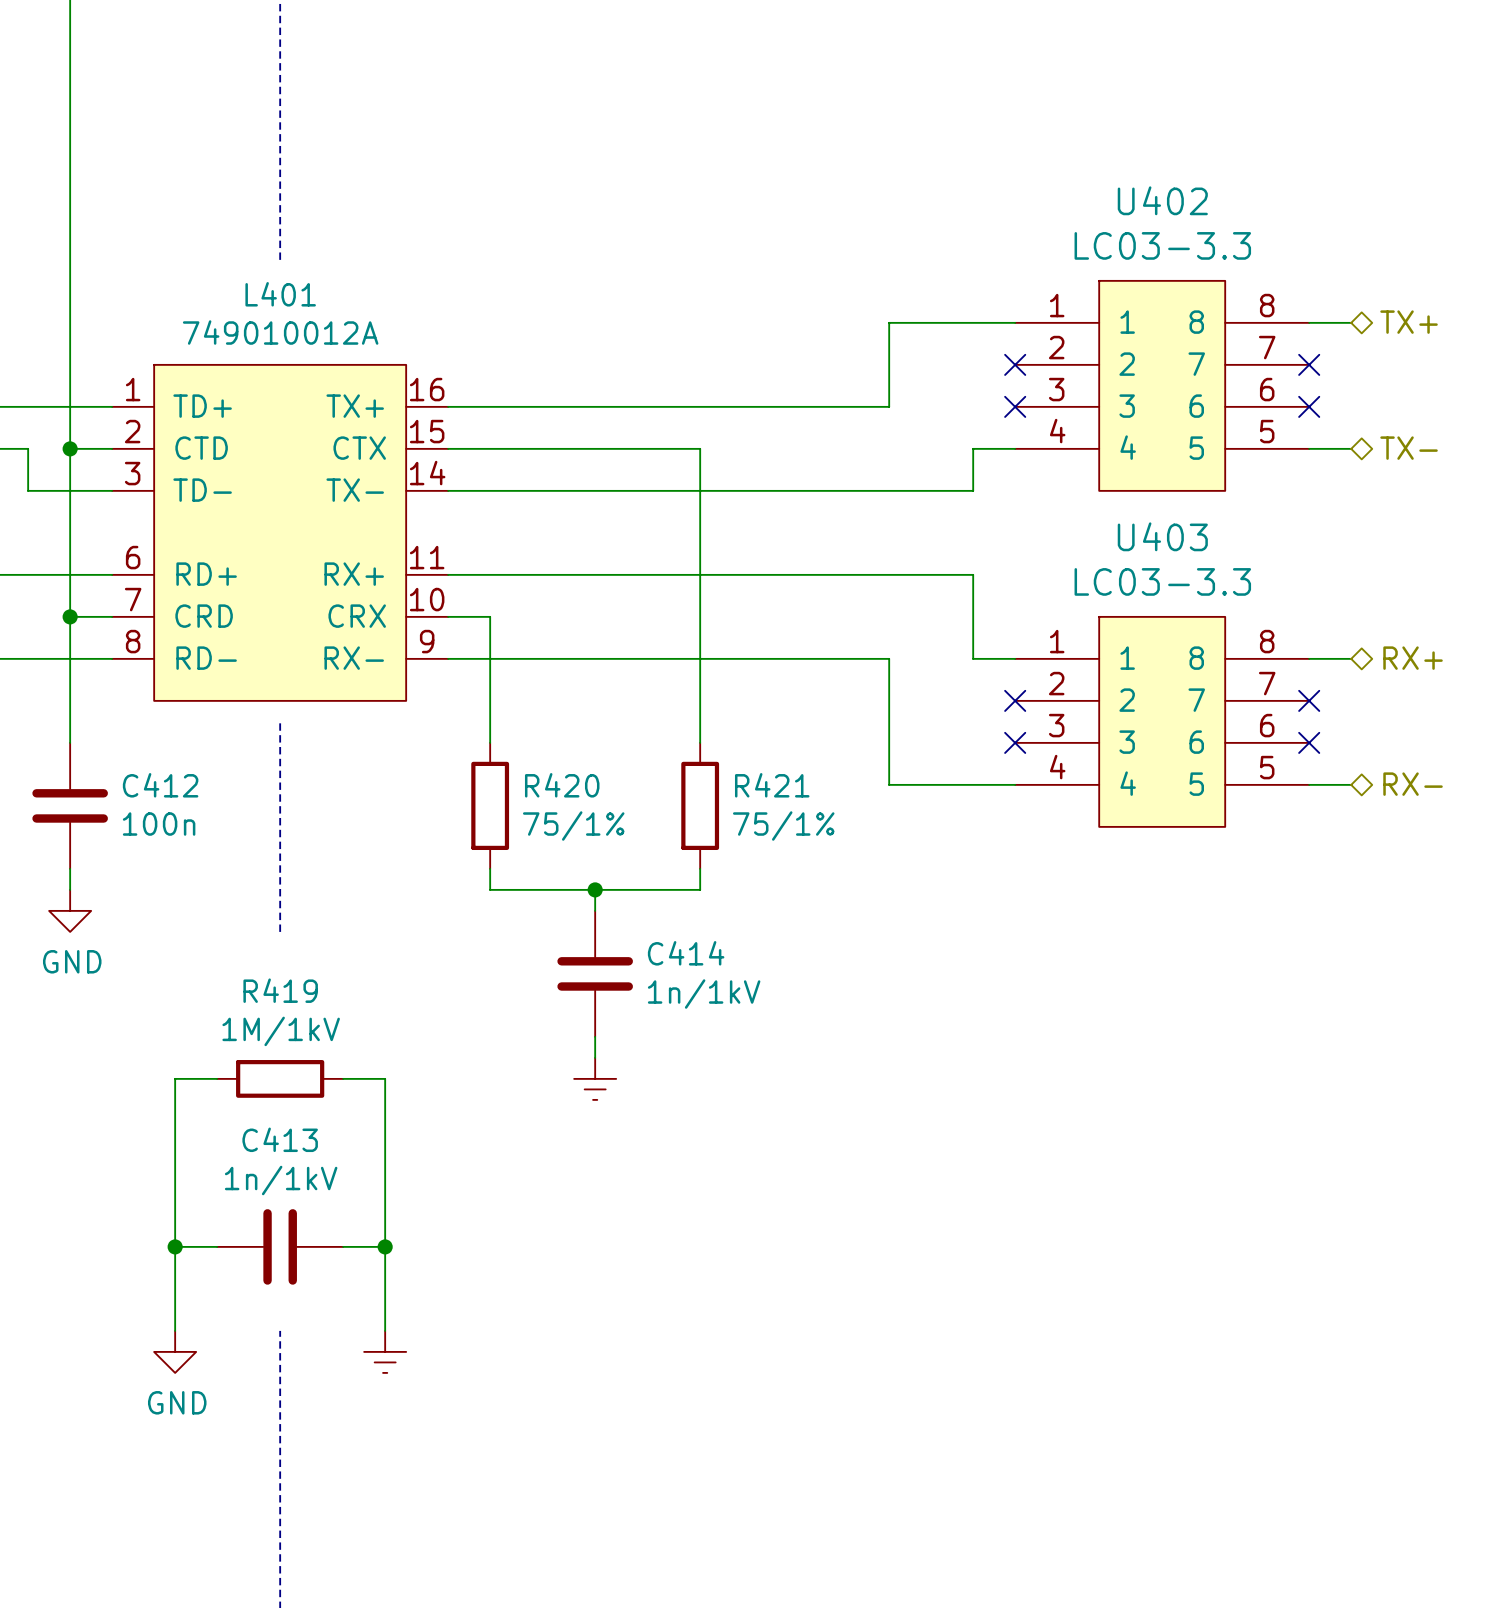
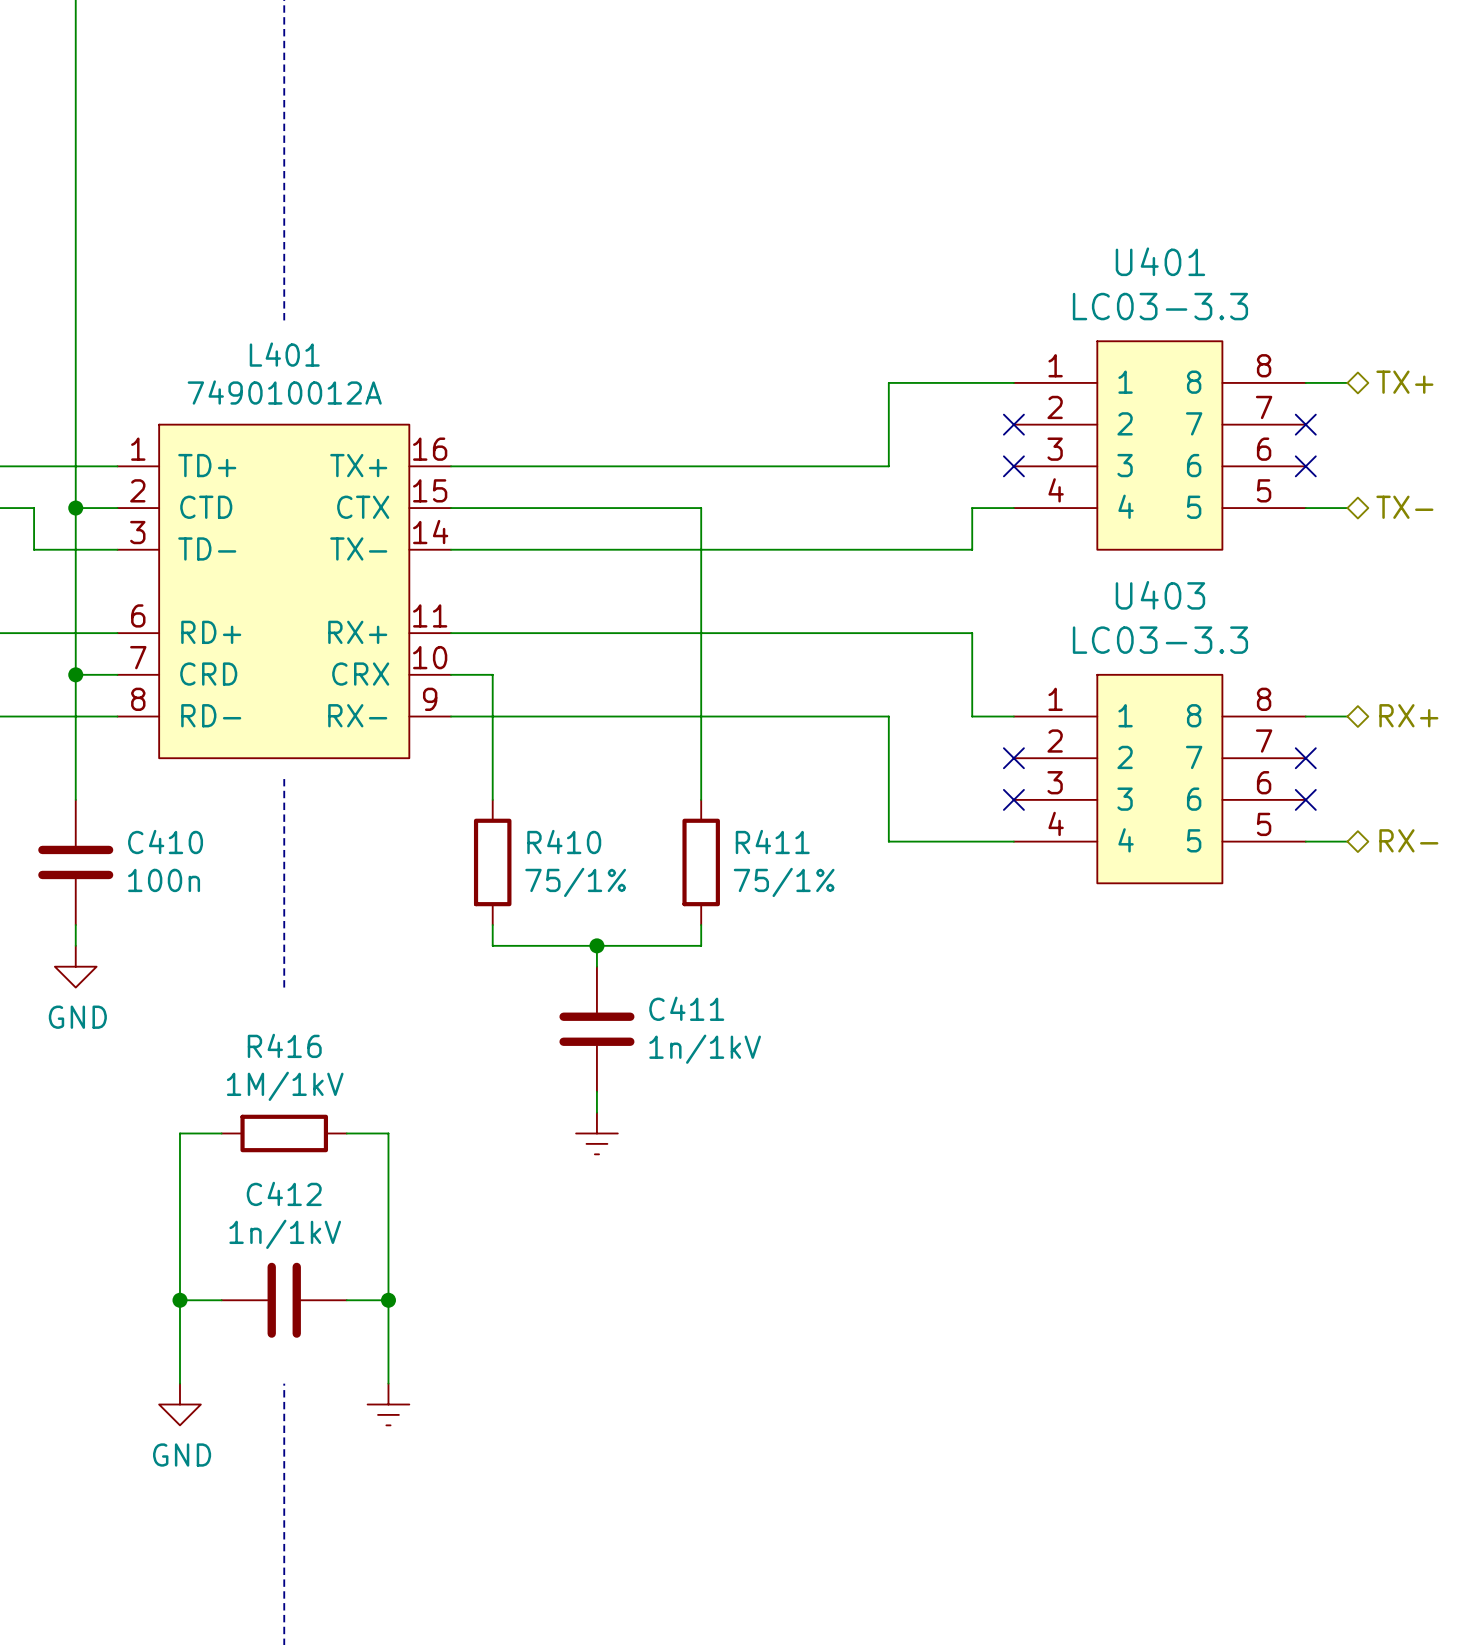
U402 name: U402 (1162, 200) -> U401 (1160, 261)
C412 name: C412 (160, 785) -> C410 (165, 842)
R420 name: R420 (562, 785) -> R410 (564, 842)
R421 name: R421 (772, 785) -> R411 (772, 842)
C414 name: C414 (686, 953) -> C411 (686, 1008)
R419 name: R419 (280, 990) -> R416 (284, 1045)
C413 name: C413 (280, 1139) -> C412 (284, 1193)

